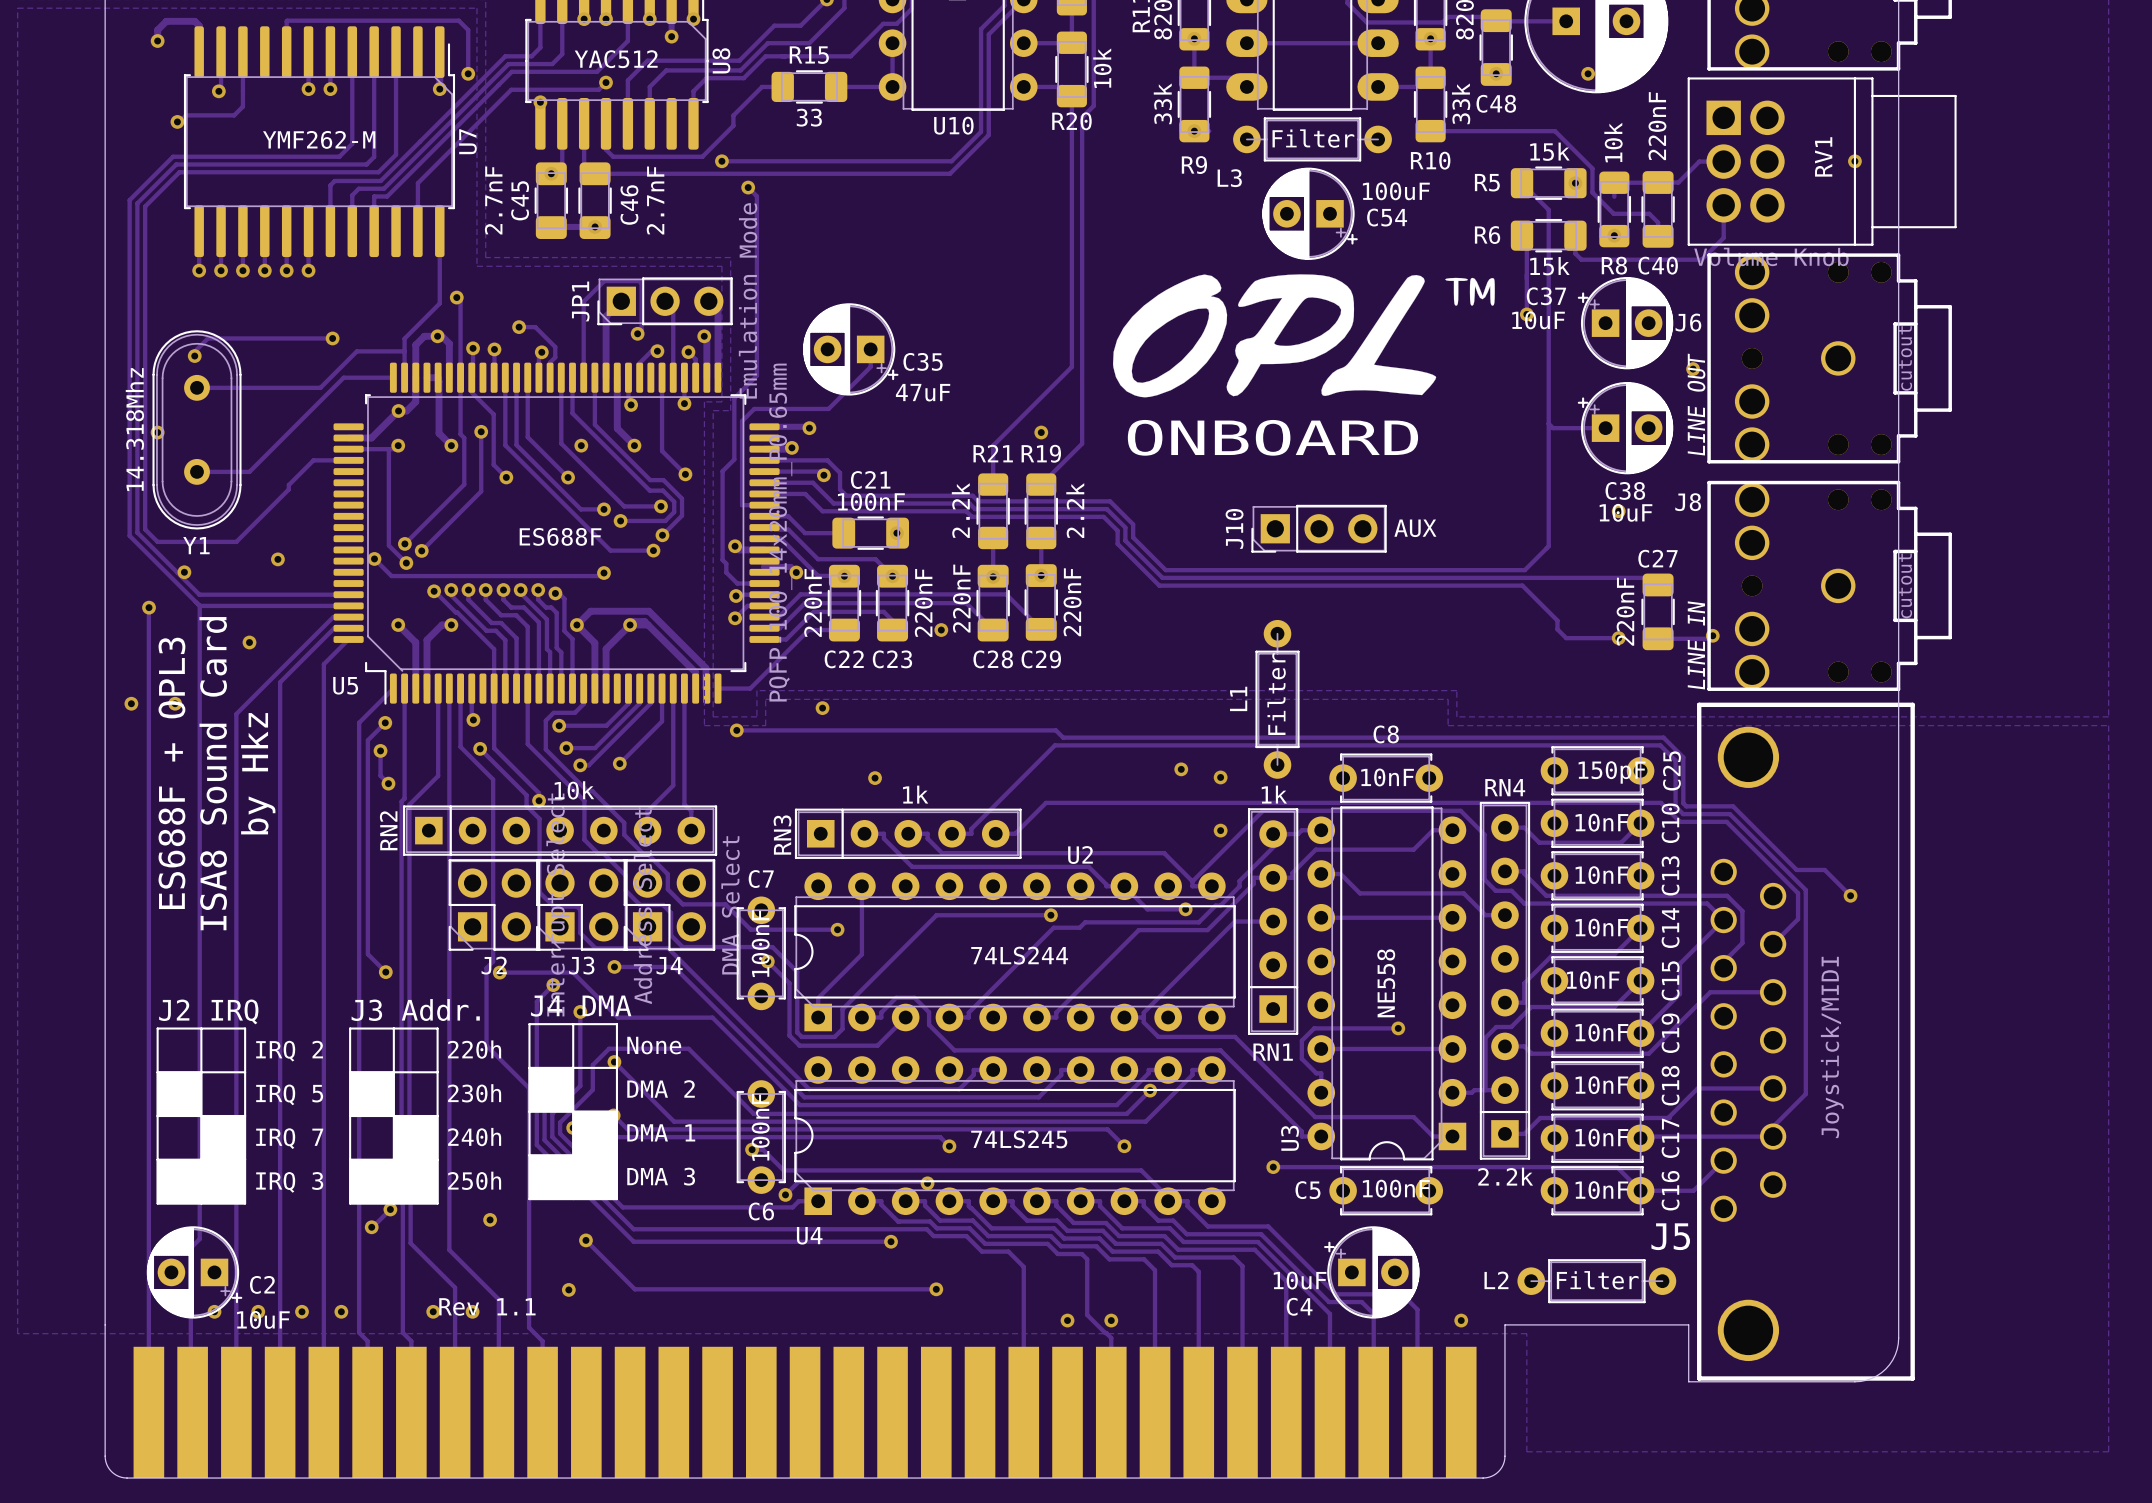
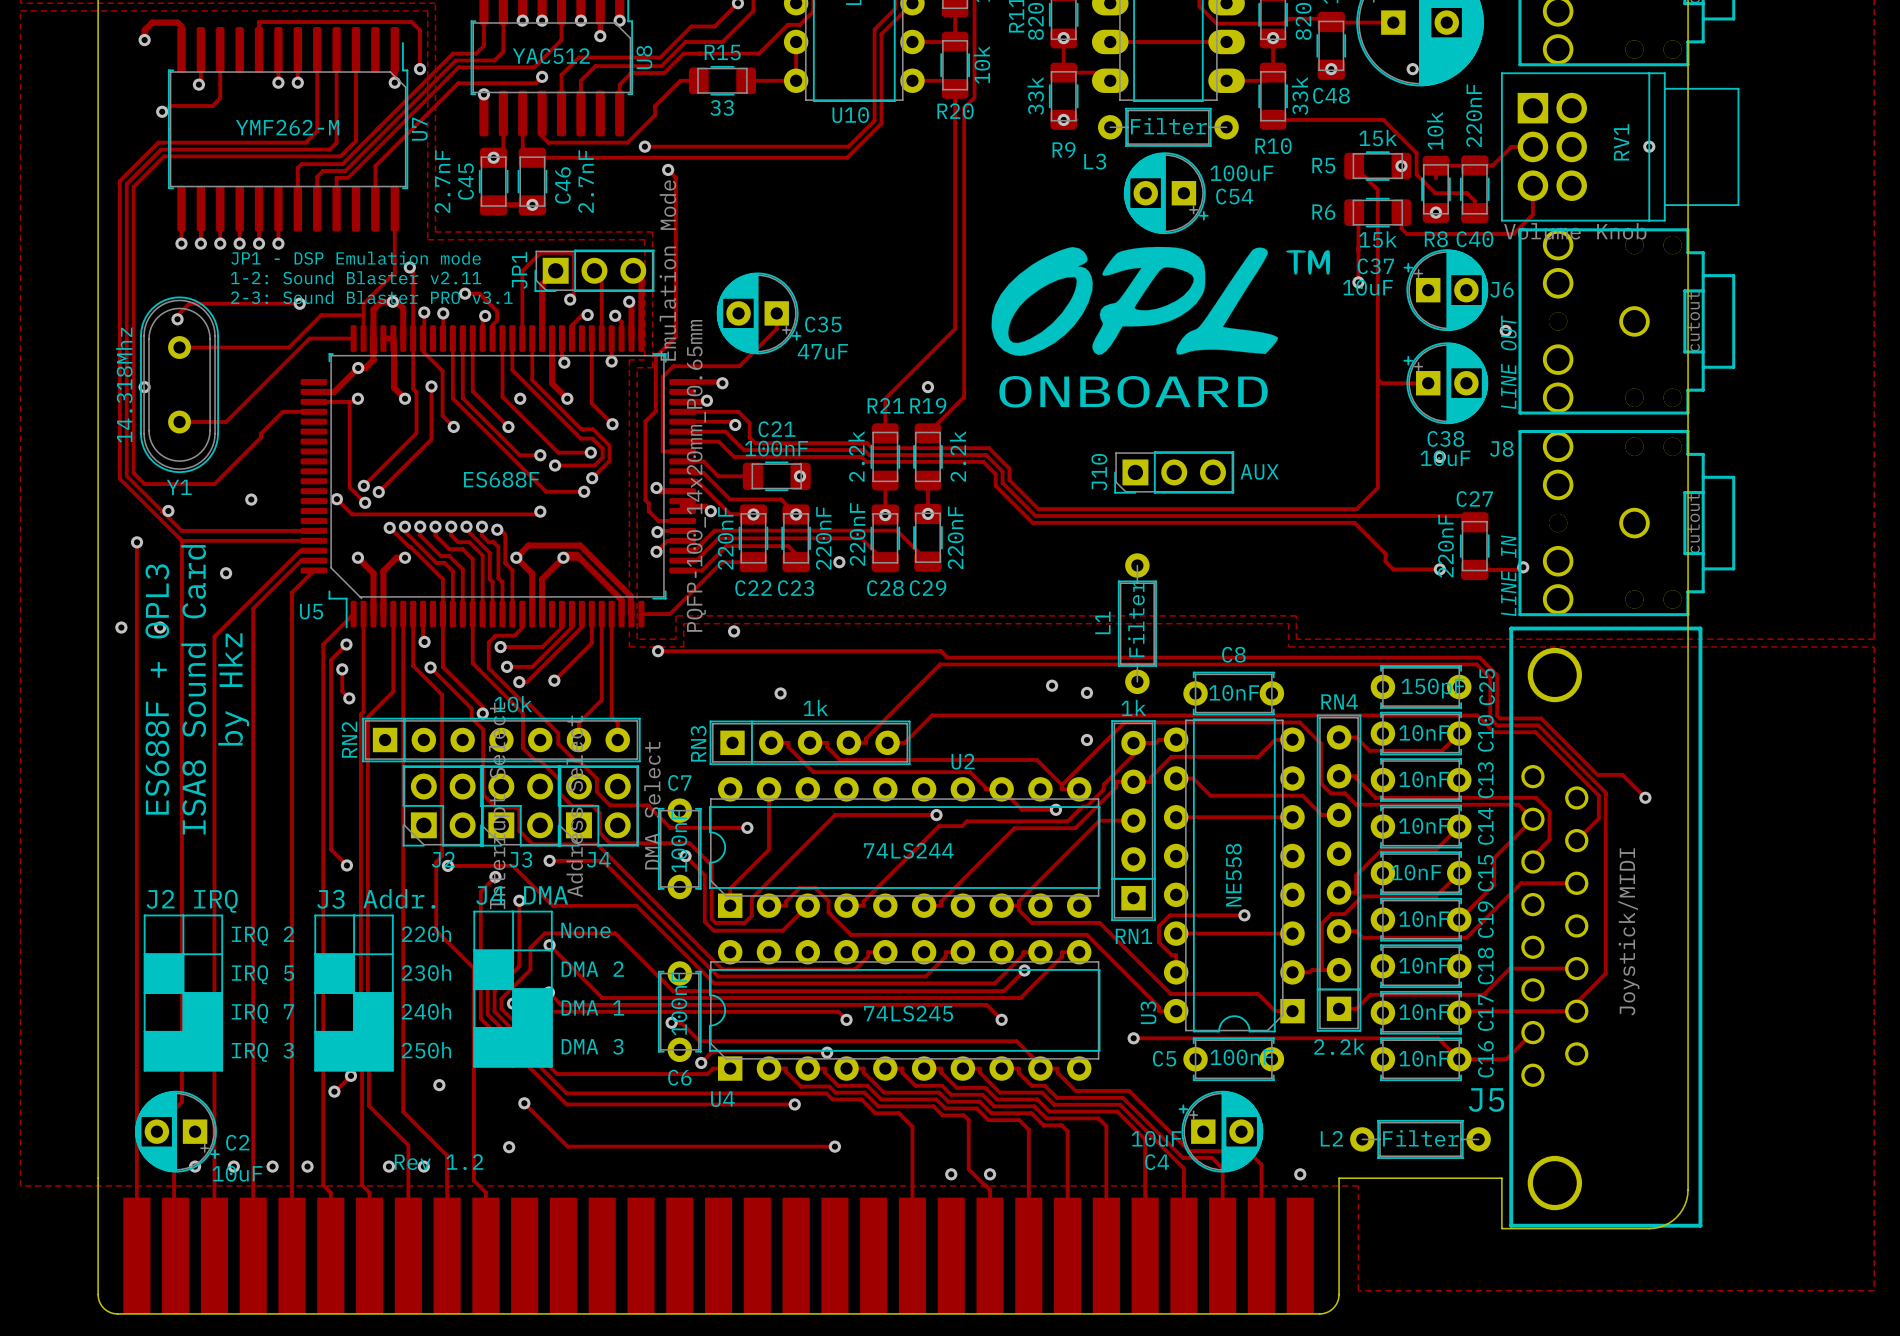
text: none -> JP1 - DSP Emulation mode (356, 258)
text: none -> 1-2: Sound Blaster v2.11 (356, 277)
text: none -> 2-3: Sound Blaster PRO v3.1 (371, 297)
text: Rev 1.1 (487, 1306) -> Rev 1.2 (439, 1162)

